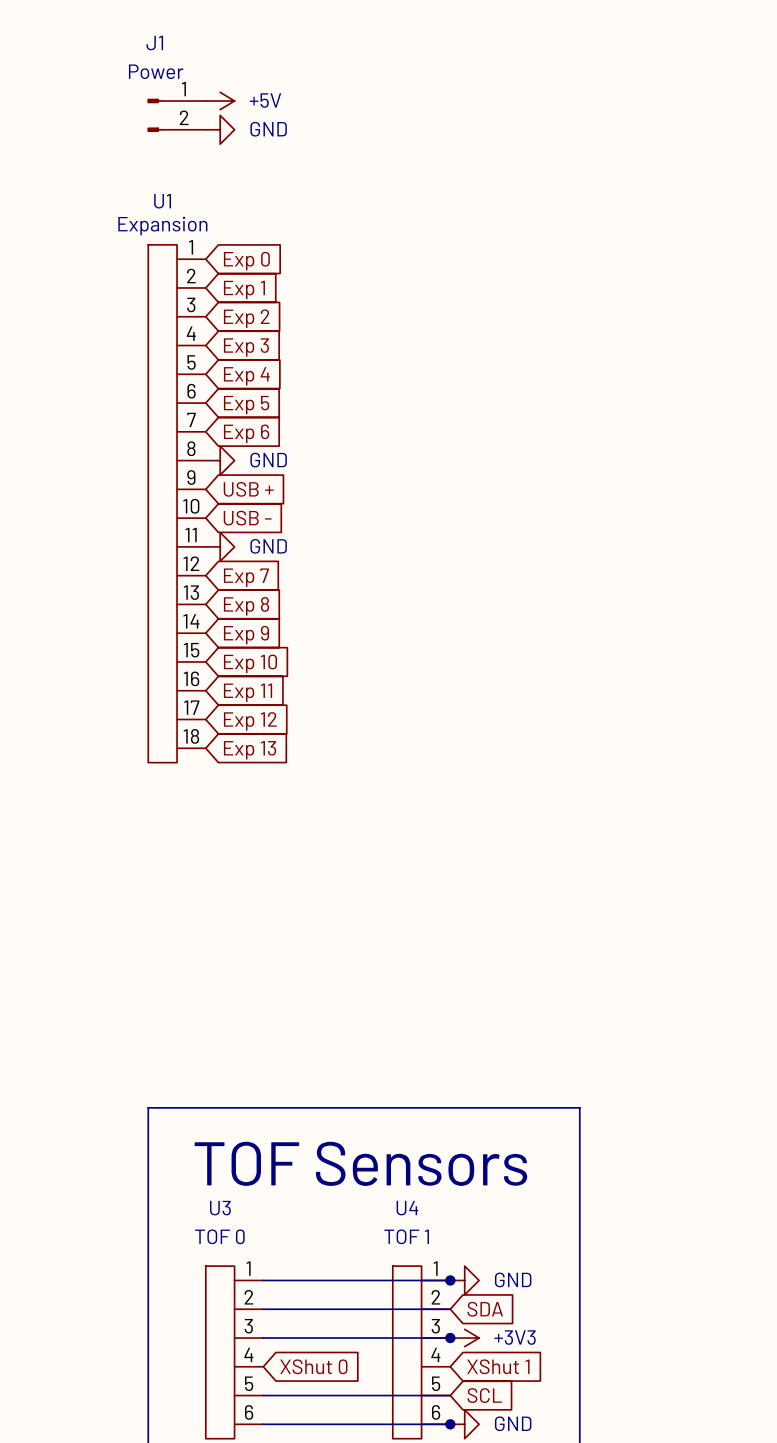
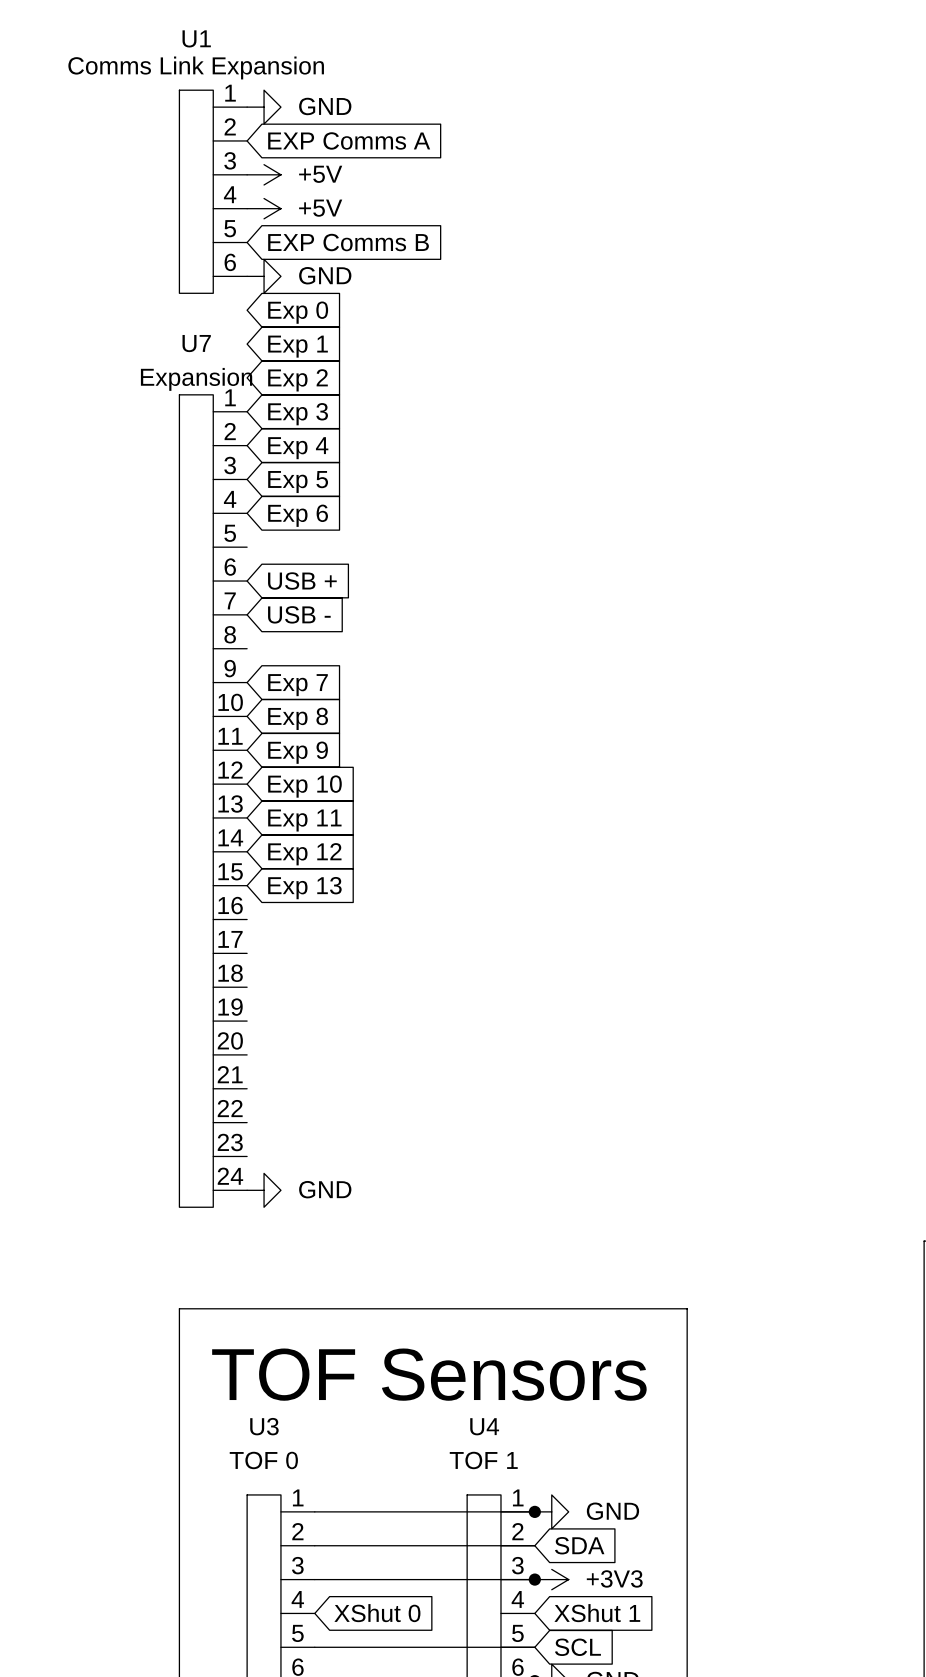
power symbol: +5V (220, 101) -> none
J1: Power (176, 115) -> none
global label: none -> EXP Comms A (349, 140)
power symbol position: GND (220, 129) -> GND (264, 107)
power symbol: none -> +5V (264, 174)
power symbol: none -> +5V (264, 208)
U1 name position: U1 (162, 201) -> U1 (196, 38)
global label: none -> EXP Comms B (348, 242)
U1 value: Expansion (162, 226) -> Comms Link Expansion (196, 67)
power symbol: none -> GND (264, 276)
U1 symbol: [148, 244, 206, 763] -> [179, 90, 248, 294]
power symbol: GND (220, 460) -> none
power symbol: GND (220, 546) -> none
U7: none -> Expansion (213, 801)
power symbol: none -> GND (264, 1190)

